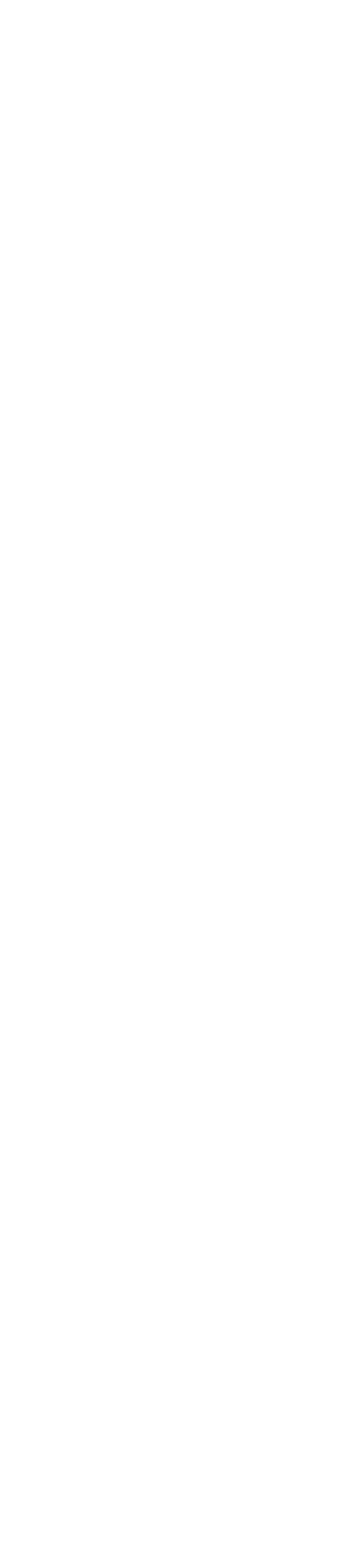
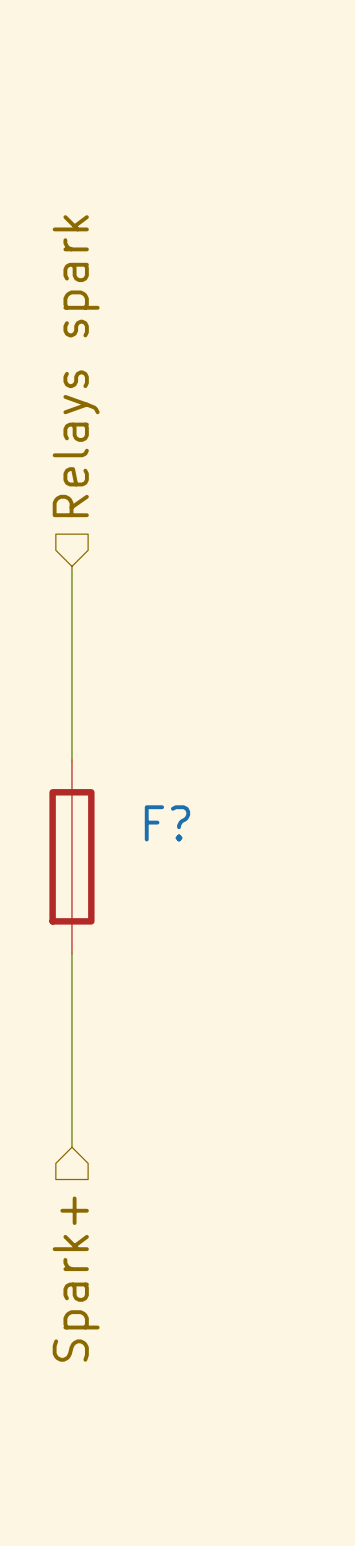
hierarchical label: none -> Relays spark (76, 366)
wire: none -> (71, 566) (71, 760)
F?: none -> (71, 856)
wire: none -> (71, 953) (71, 1147)
hierarchical label: none -> Spark+ (76, 1279)

